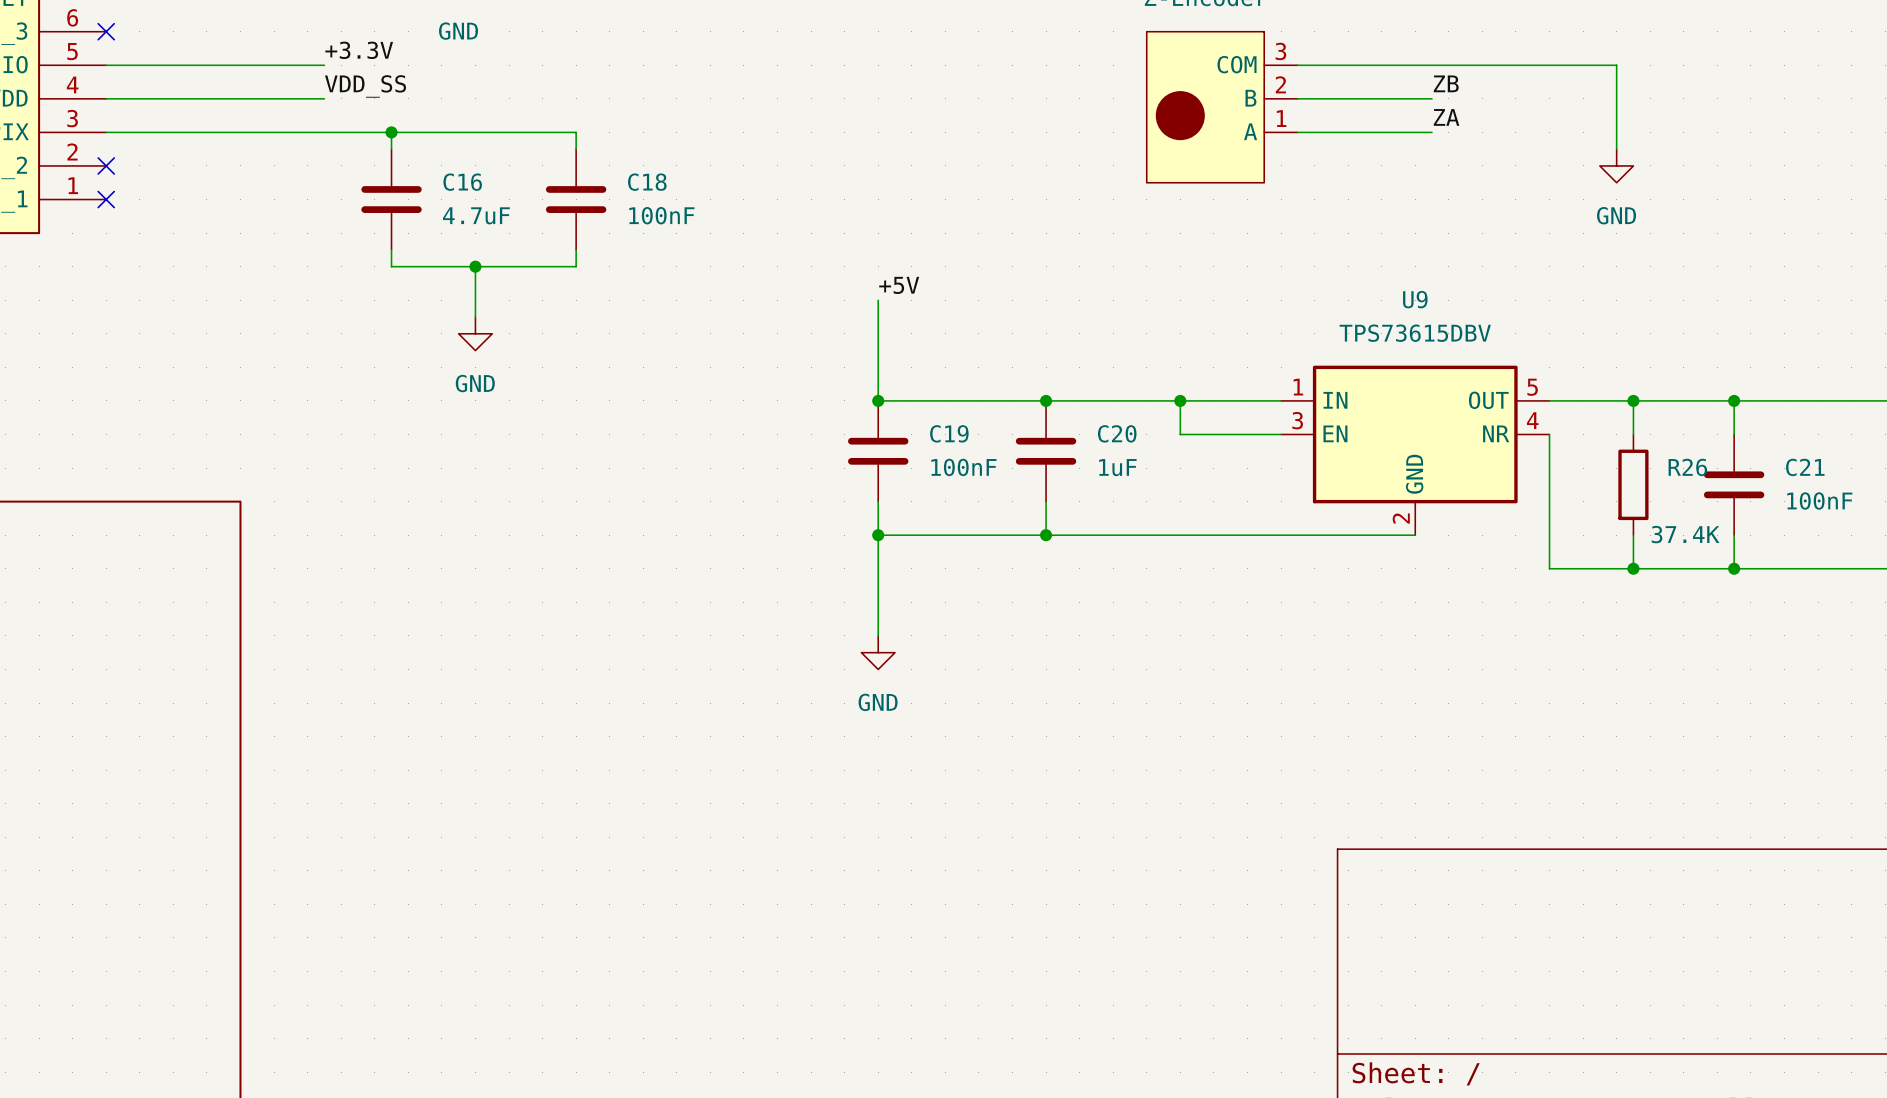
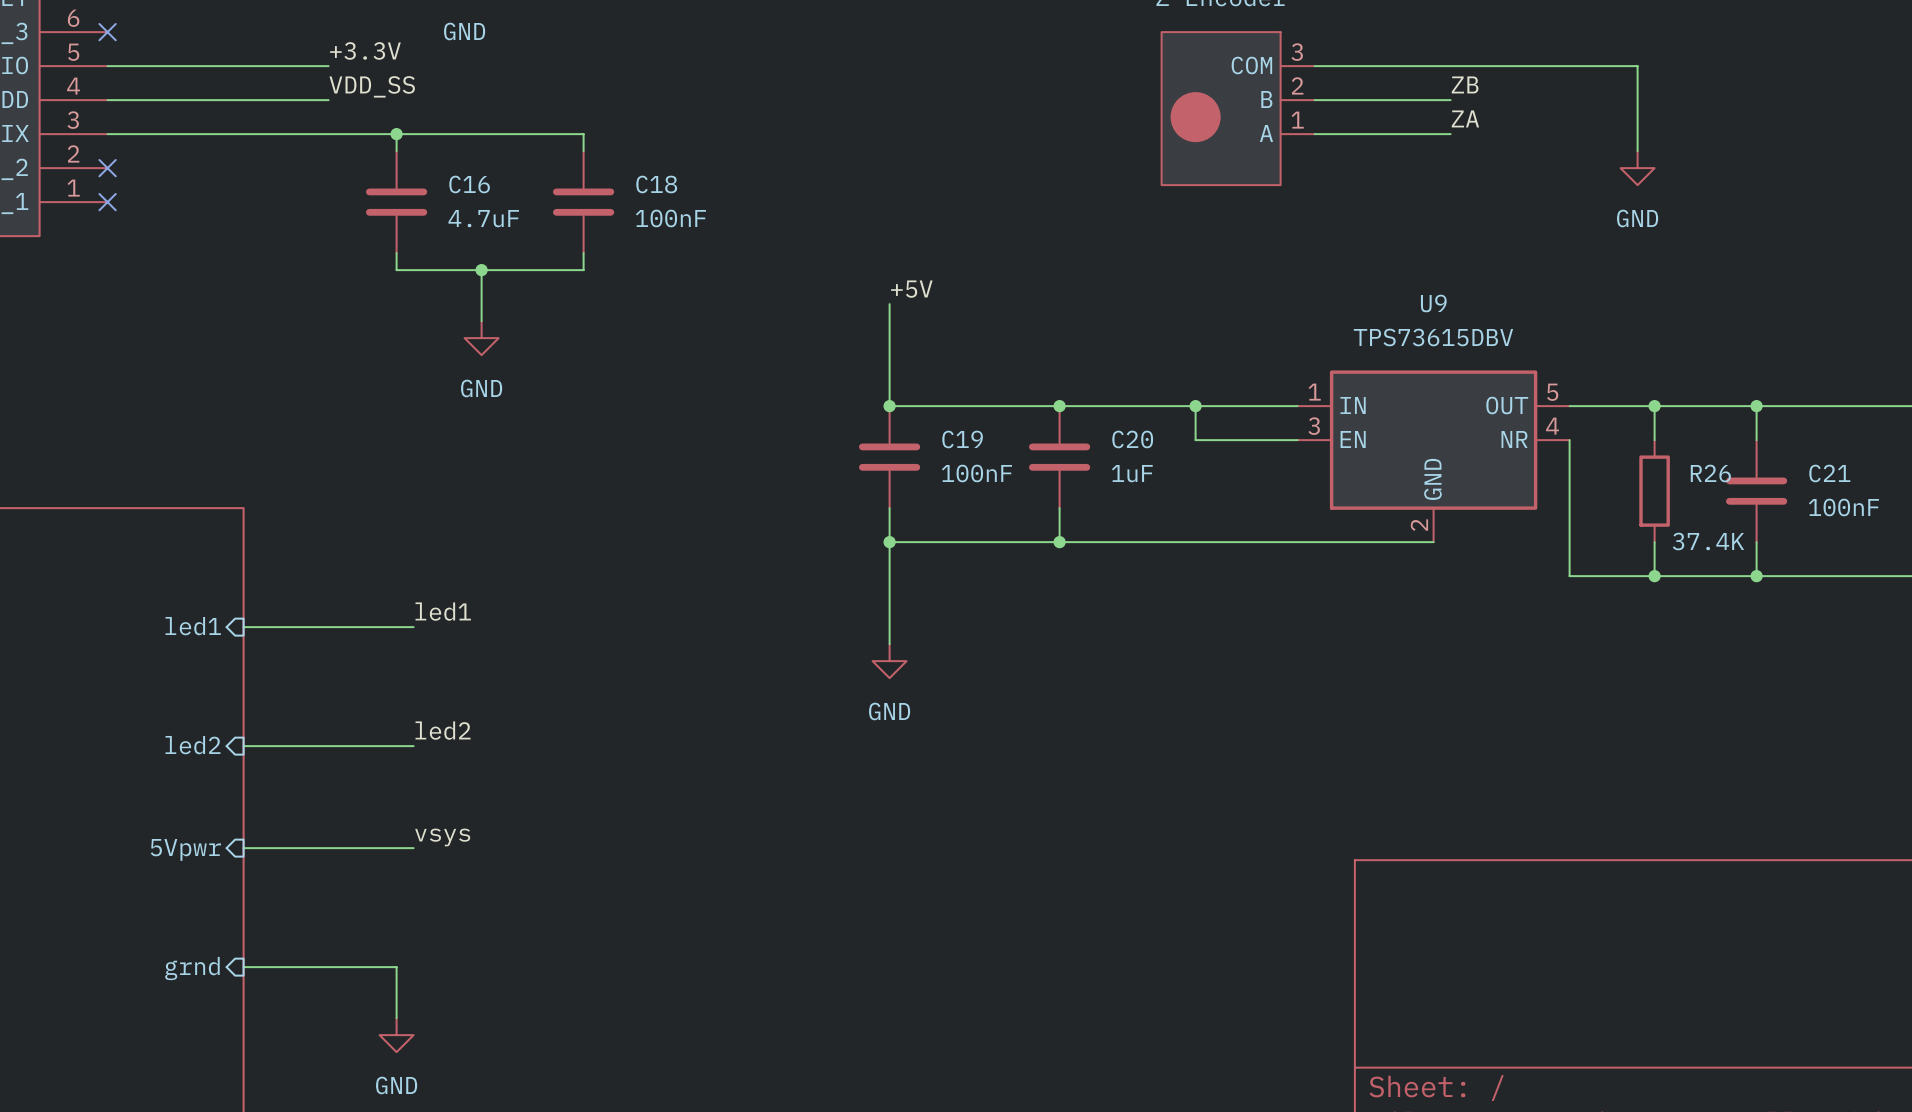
label: none -> led1 (443, 611)
sheet pin: none -> led1 (193, 626)
wire: none -> (243, 627) (413, 627)
label: none -> led2 (443, 730)
sheet pin: none -> led2 (192, 745)
wire: none -> (243, 746) (413, 746)
label: none -> vsys (442, 837)
wire: none -> (243, 848) (413, 848)
sheet pin: none -> 5Vpwr (185, 849)
wire: none -> (243, 967) (396, 967) (396, 1018)
sheet pin: none -> grnd (192, 968)
power symbol: none -> GND (396, 1035)

